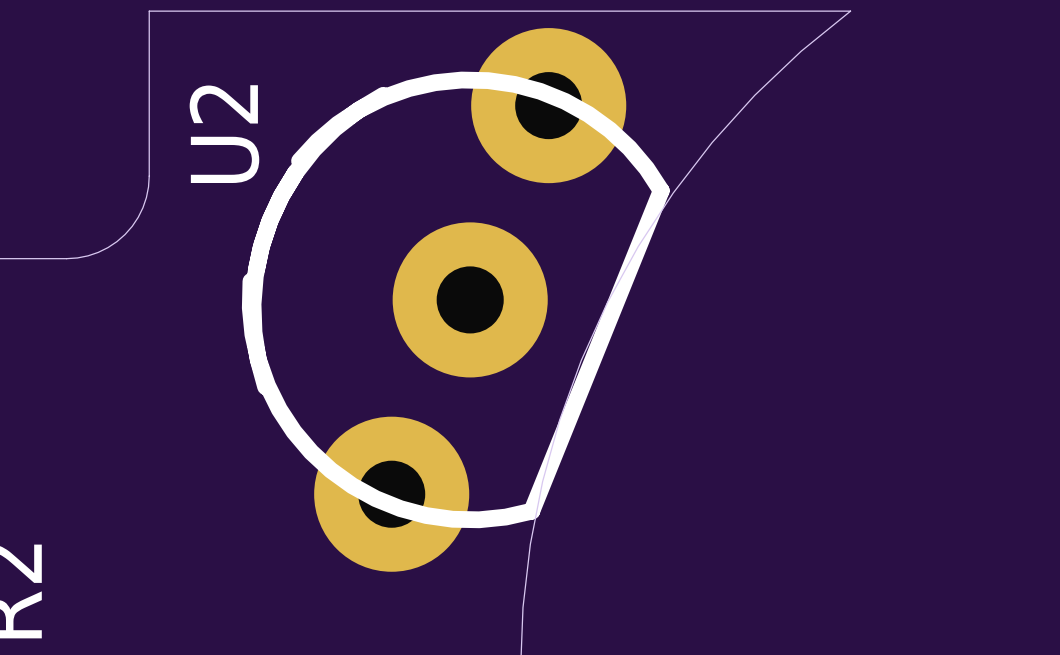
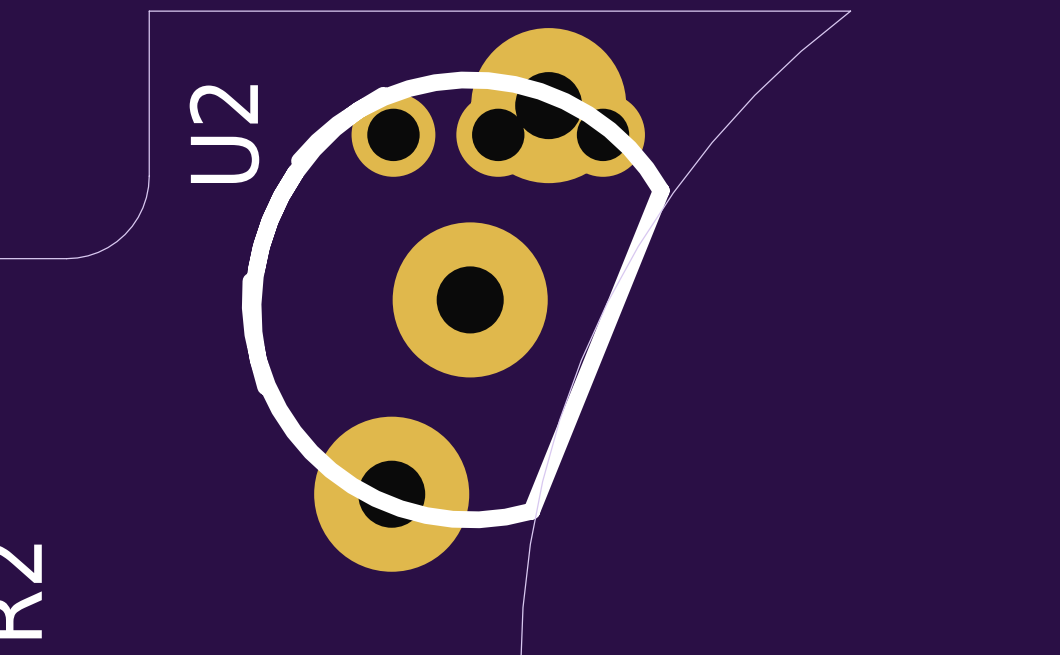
part: none -> (498, 134)

